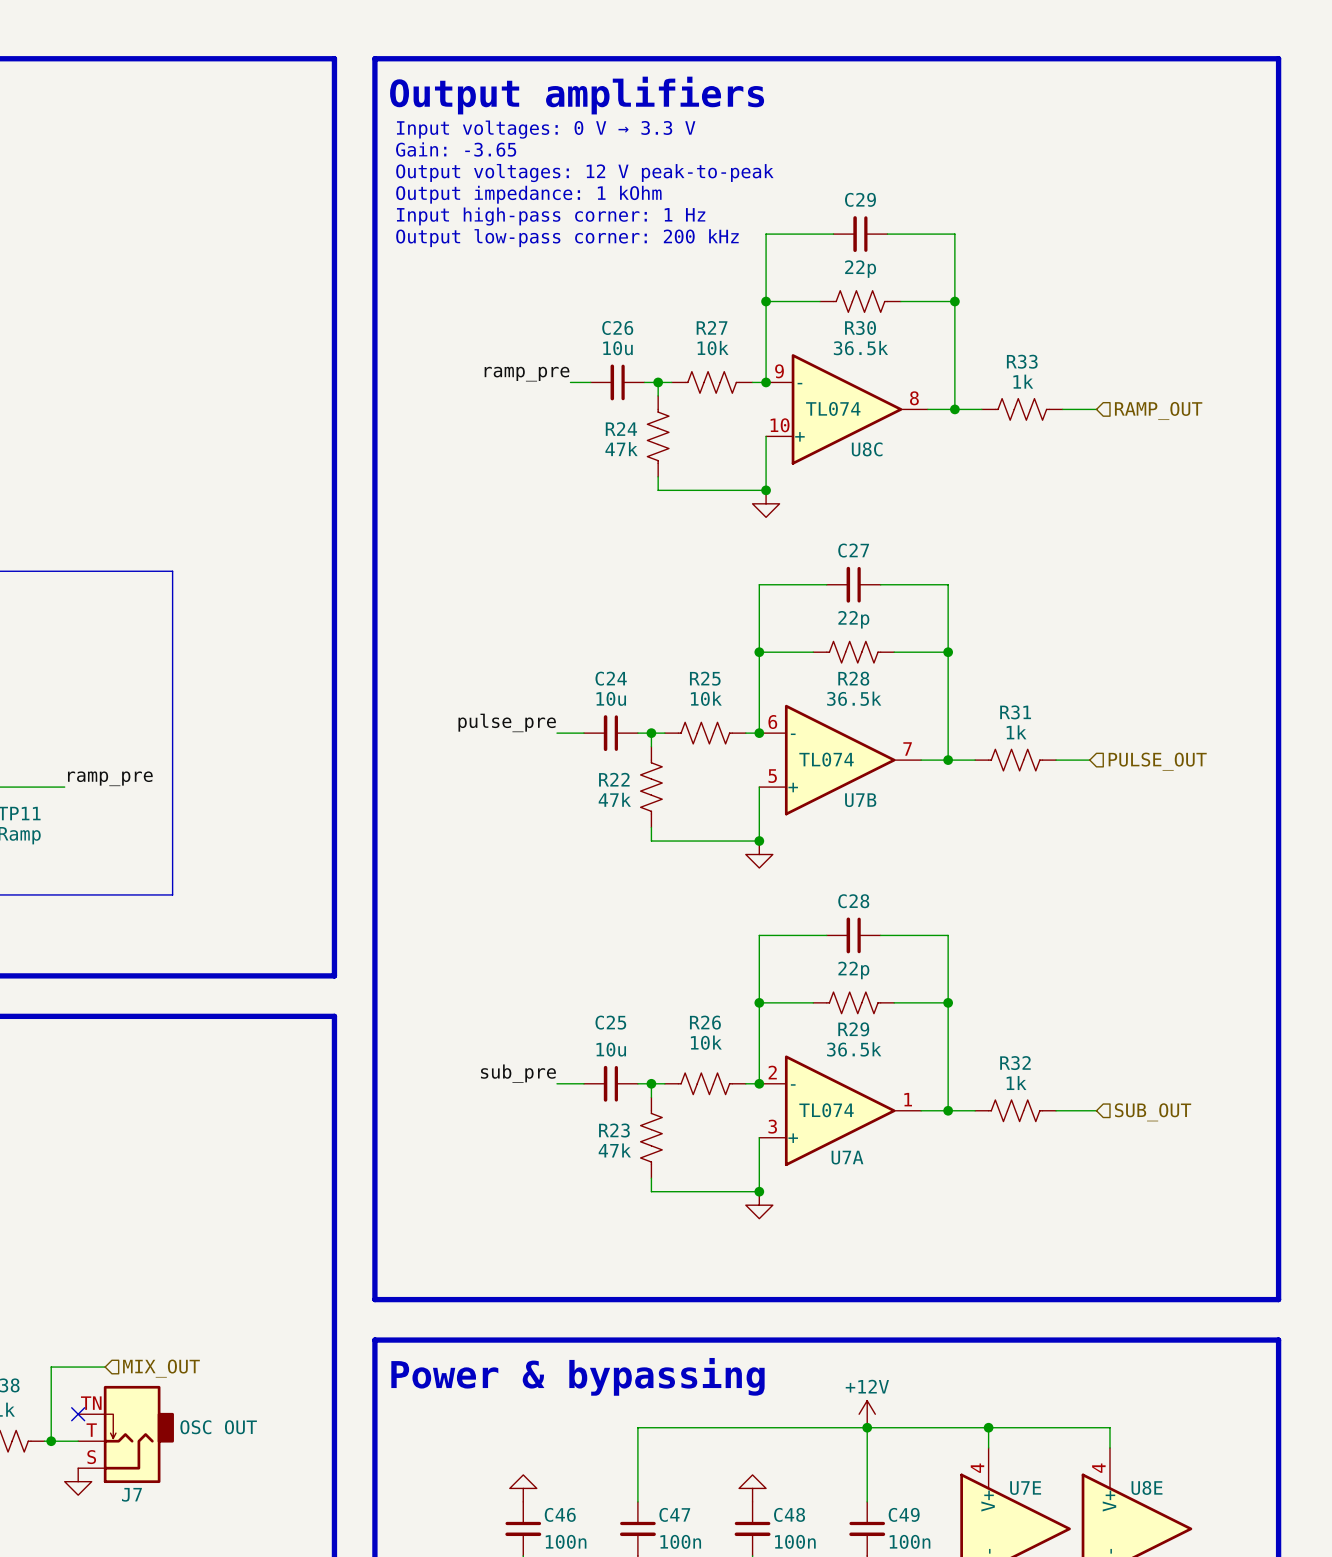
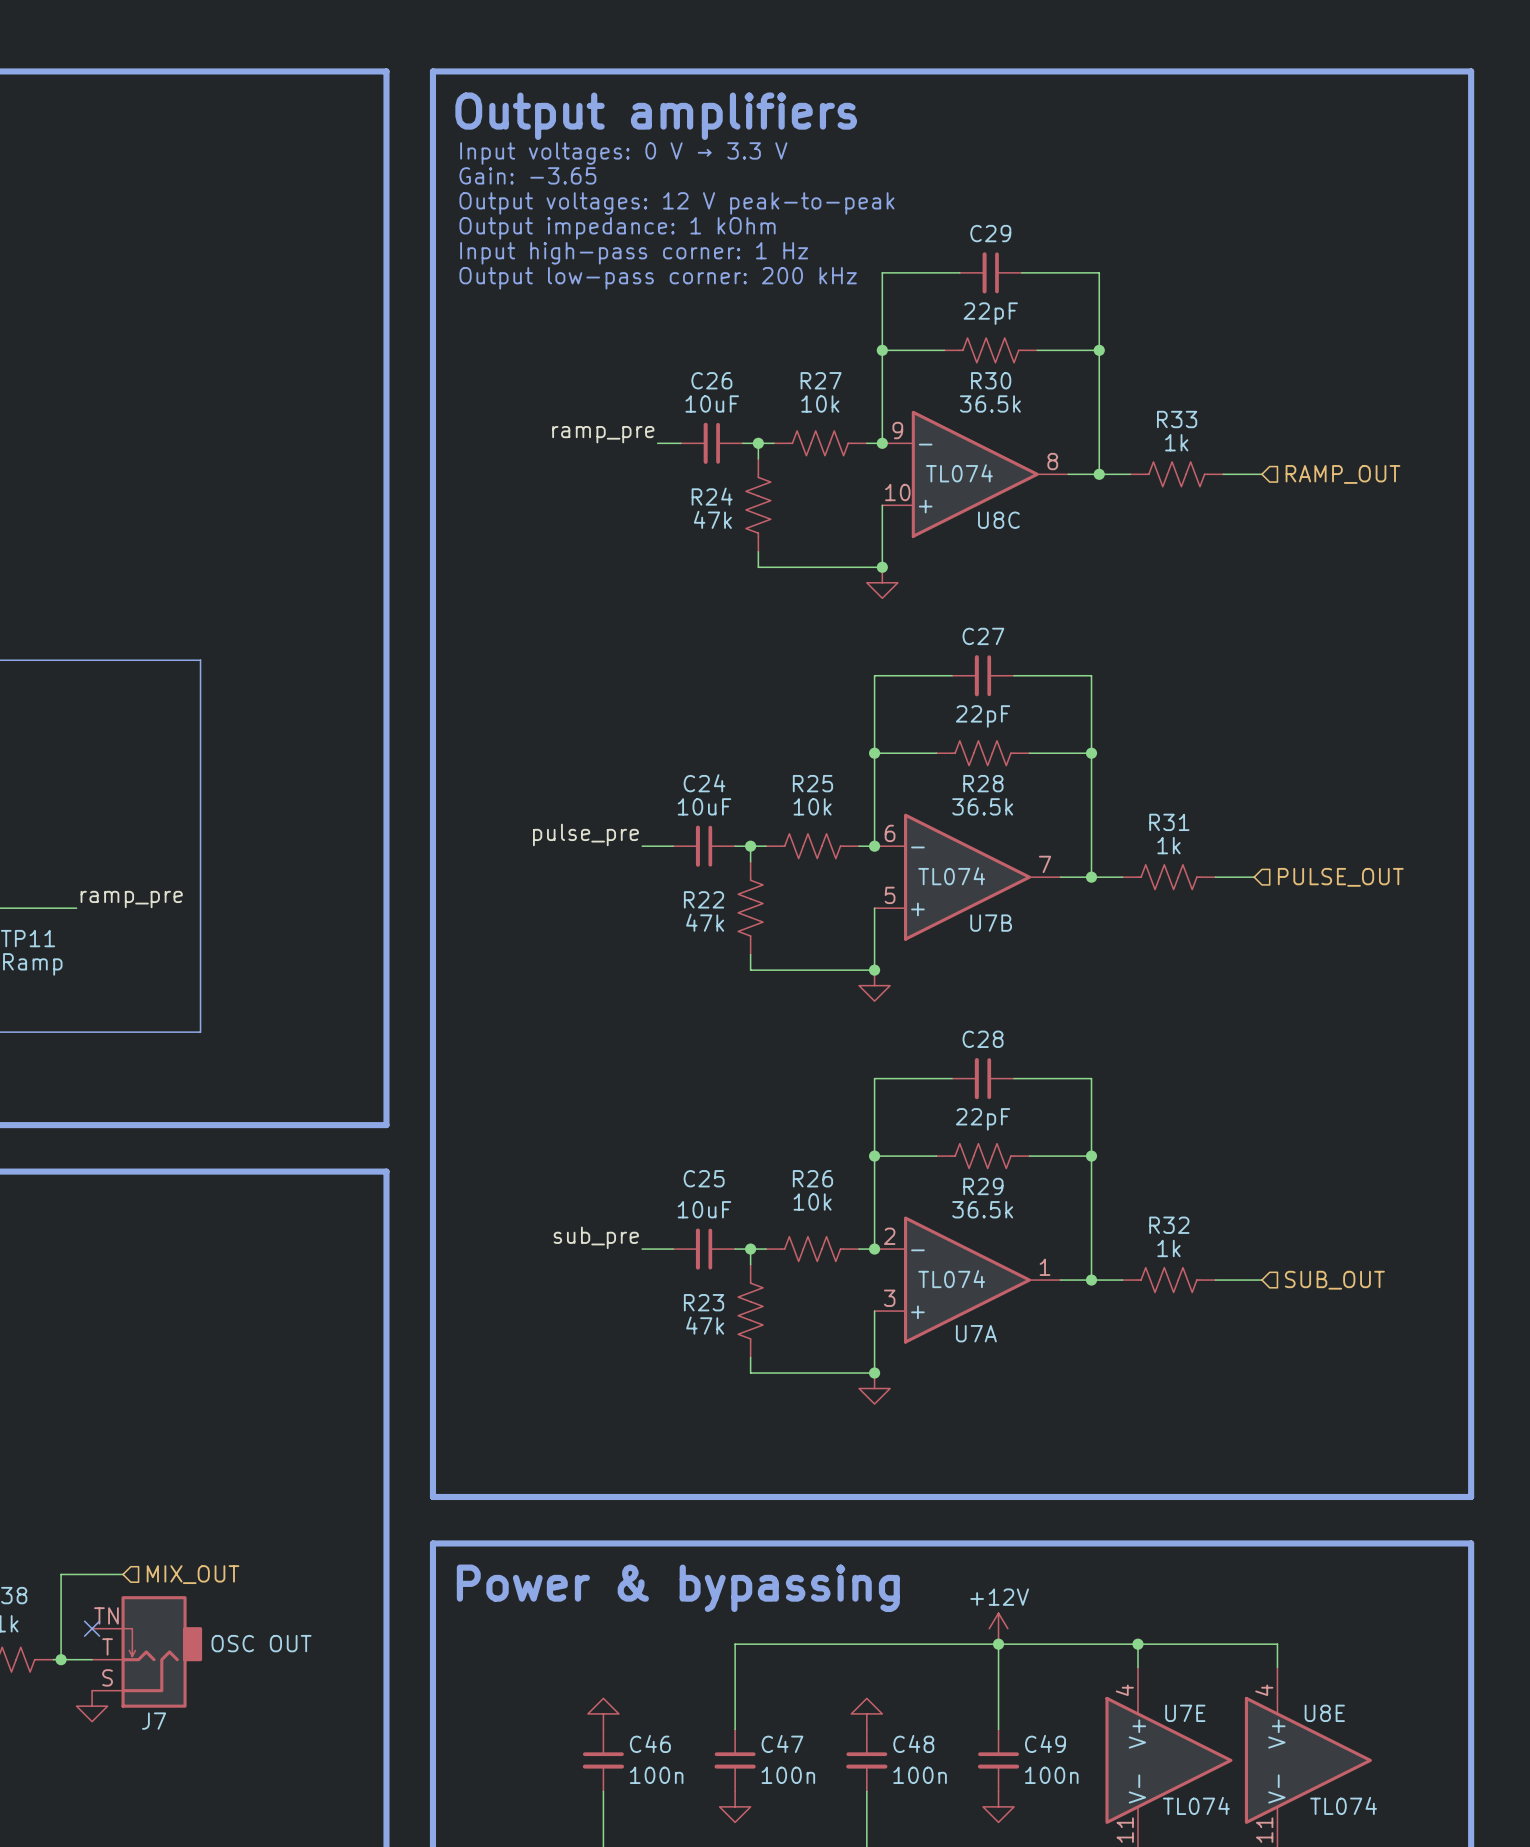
C29 value: 22p (860, 269) -> 22pF (990, 313)
C26 value: 10u (617, 348) -> 10uF (712, 404)
C27 value: 22p (853, 619) -> 22pF (983, 716)
C24 value: 10u (611, 698) -> 10uF (704, 806)
C28 value: 22p (853, 970) -> 22pF (983, 1119)
C25 value: 10u (611, 1049) -> 10uF (704, 1209)

